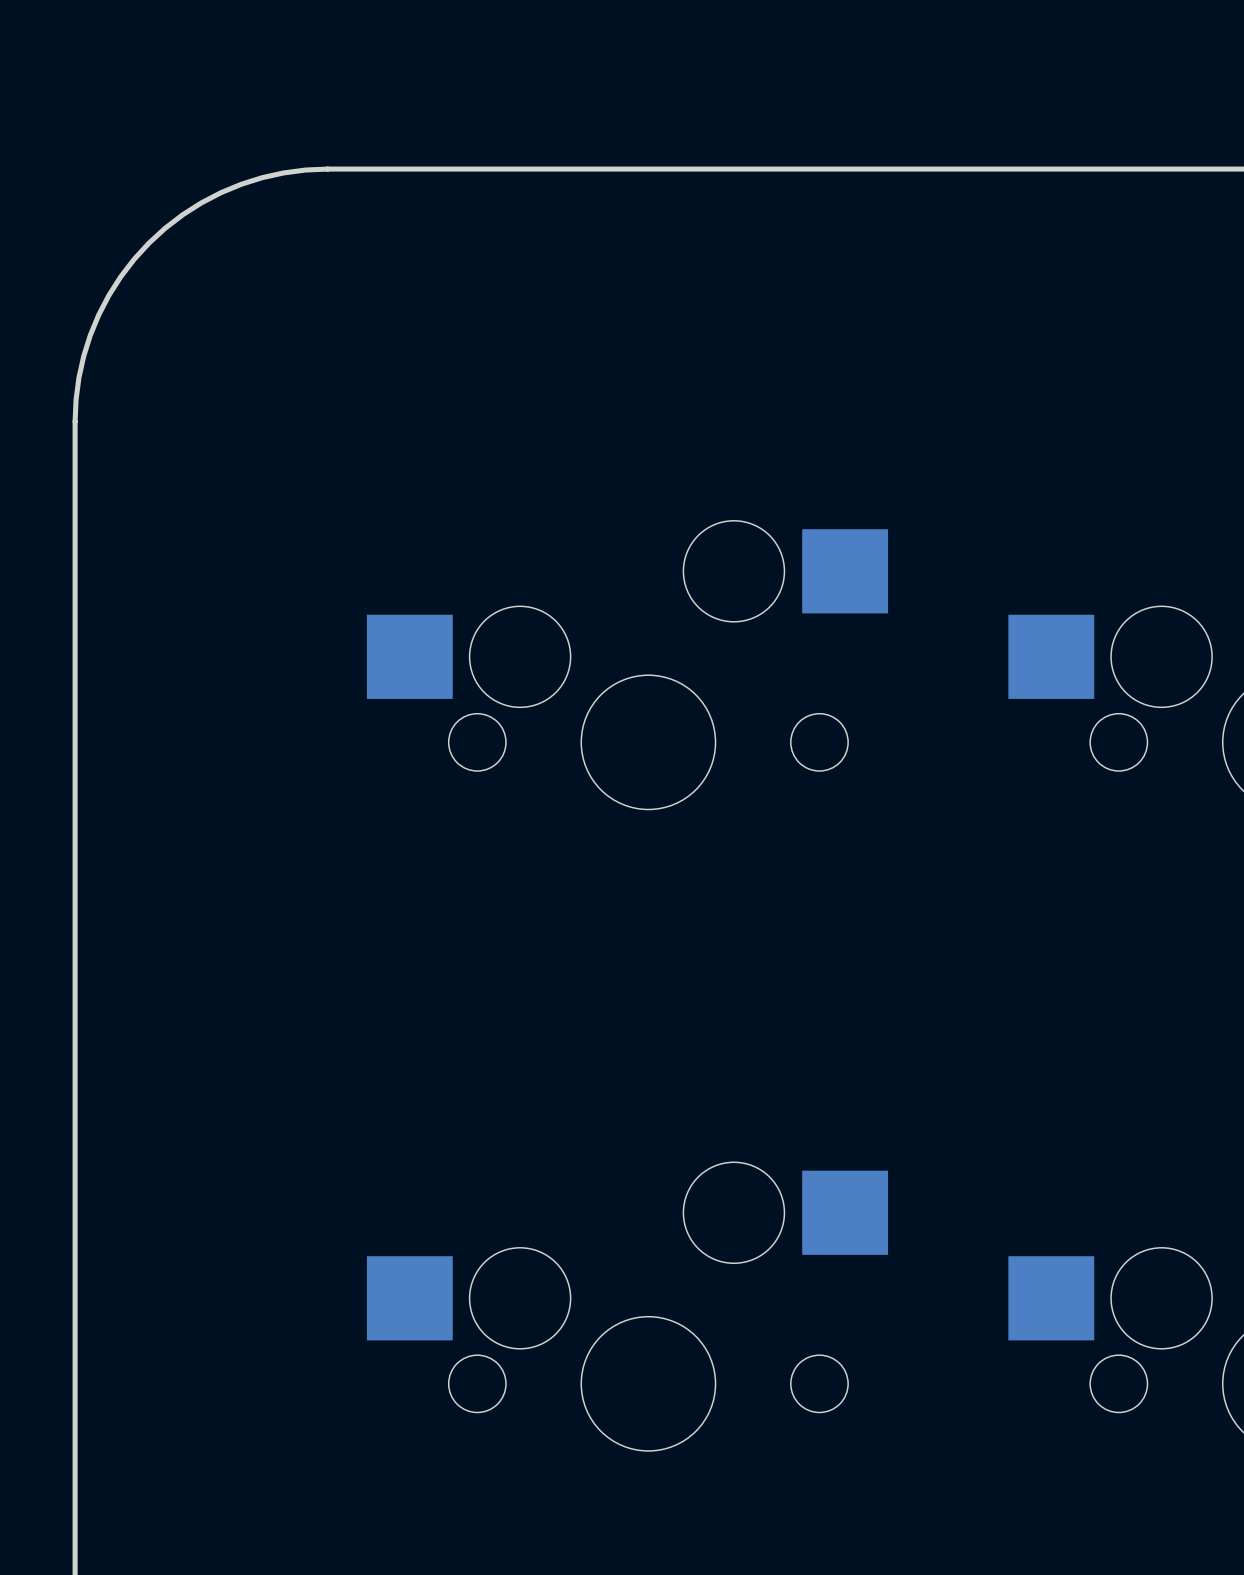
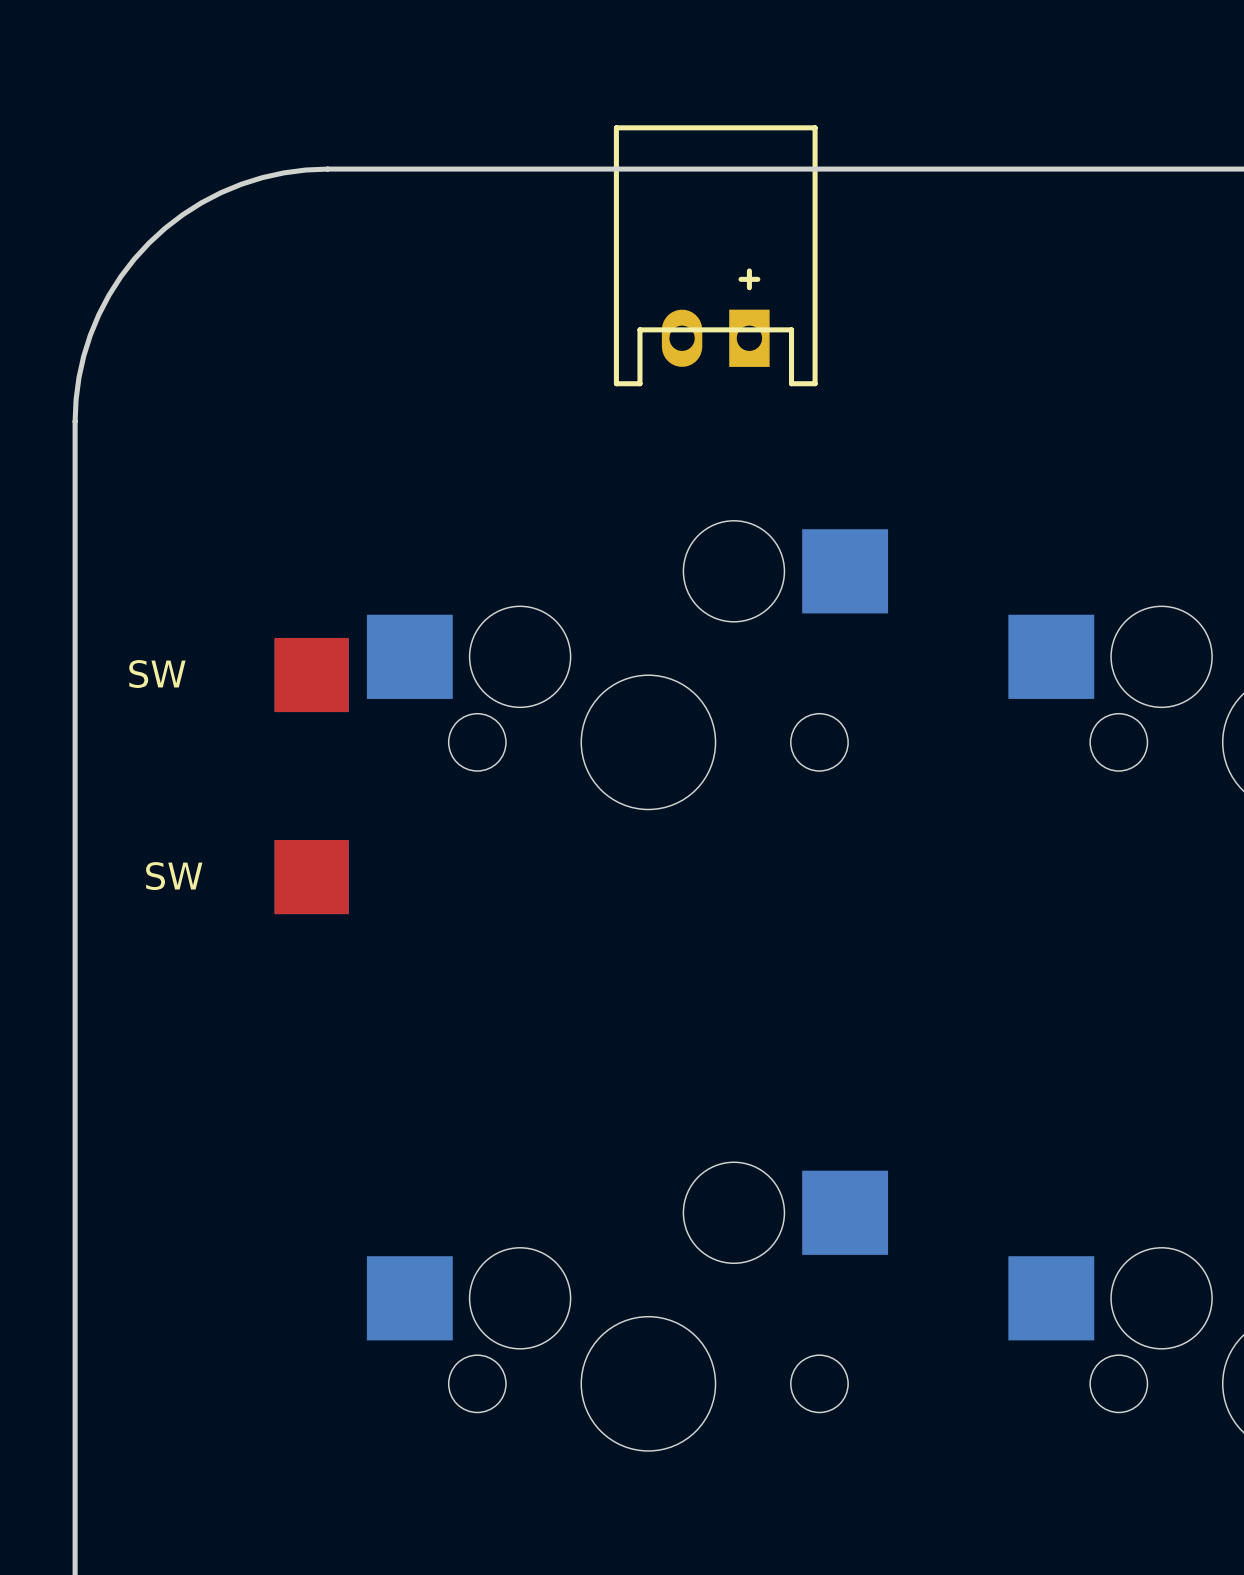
part: none -> (715, 255)
part: none -> (311, 675)
part: none -> (311, 877)

